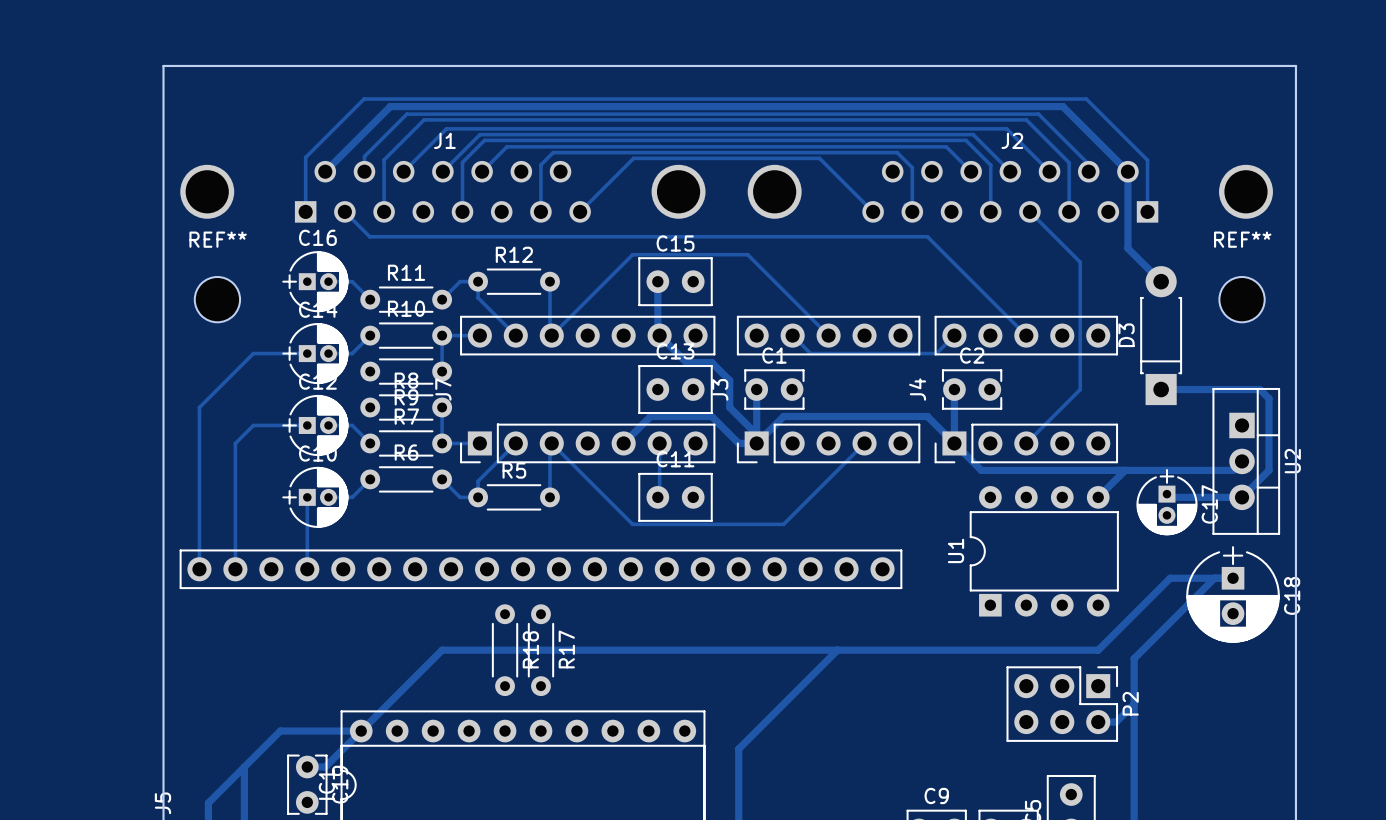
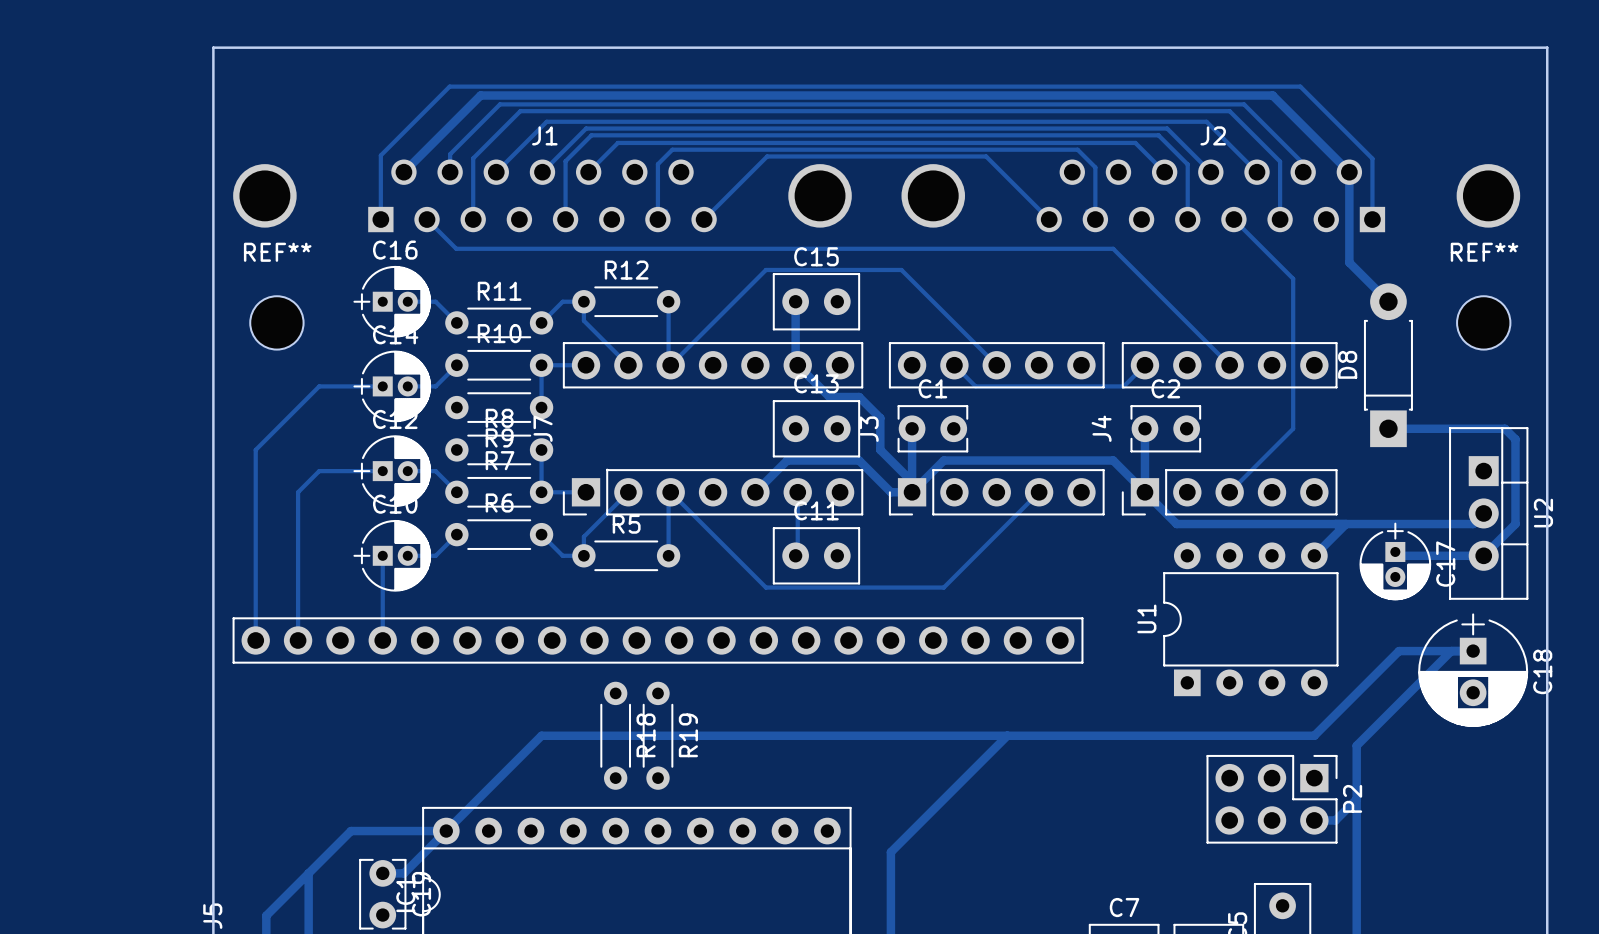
D3 name: D3 (1126, 335) -> D8 (1347, 364)
R17 name: R17 (566, 649) -> R19 (688, 735)
C9 name: C9 (936, 795) -> C7 (1124, 907)

